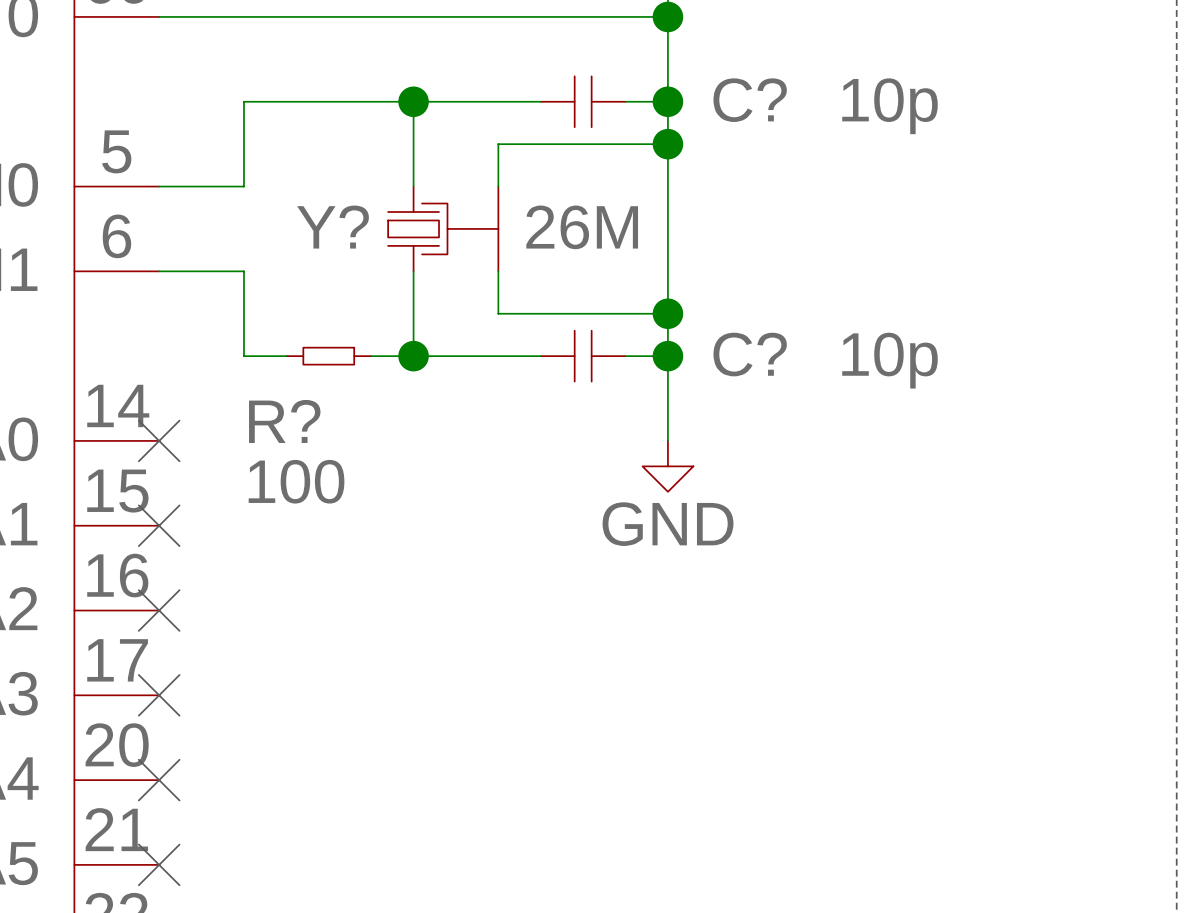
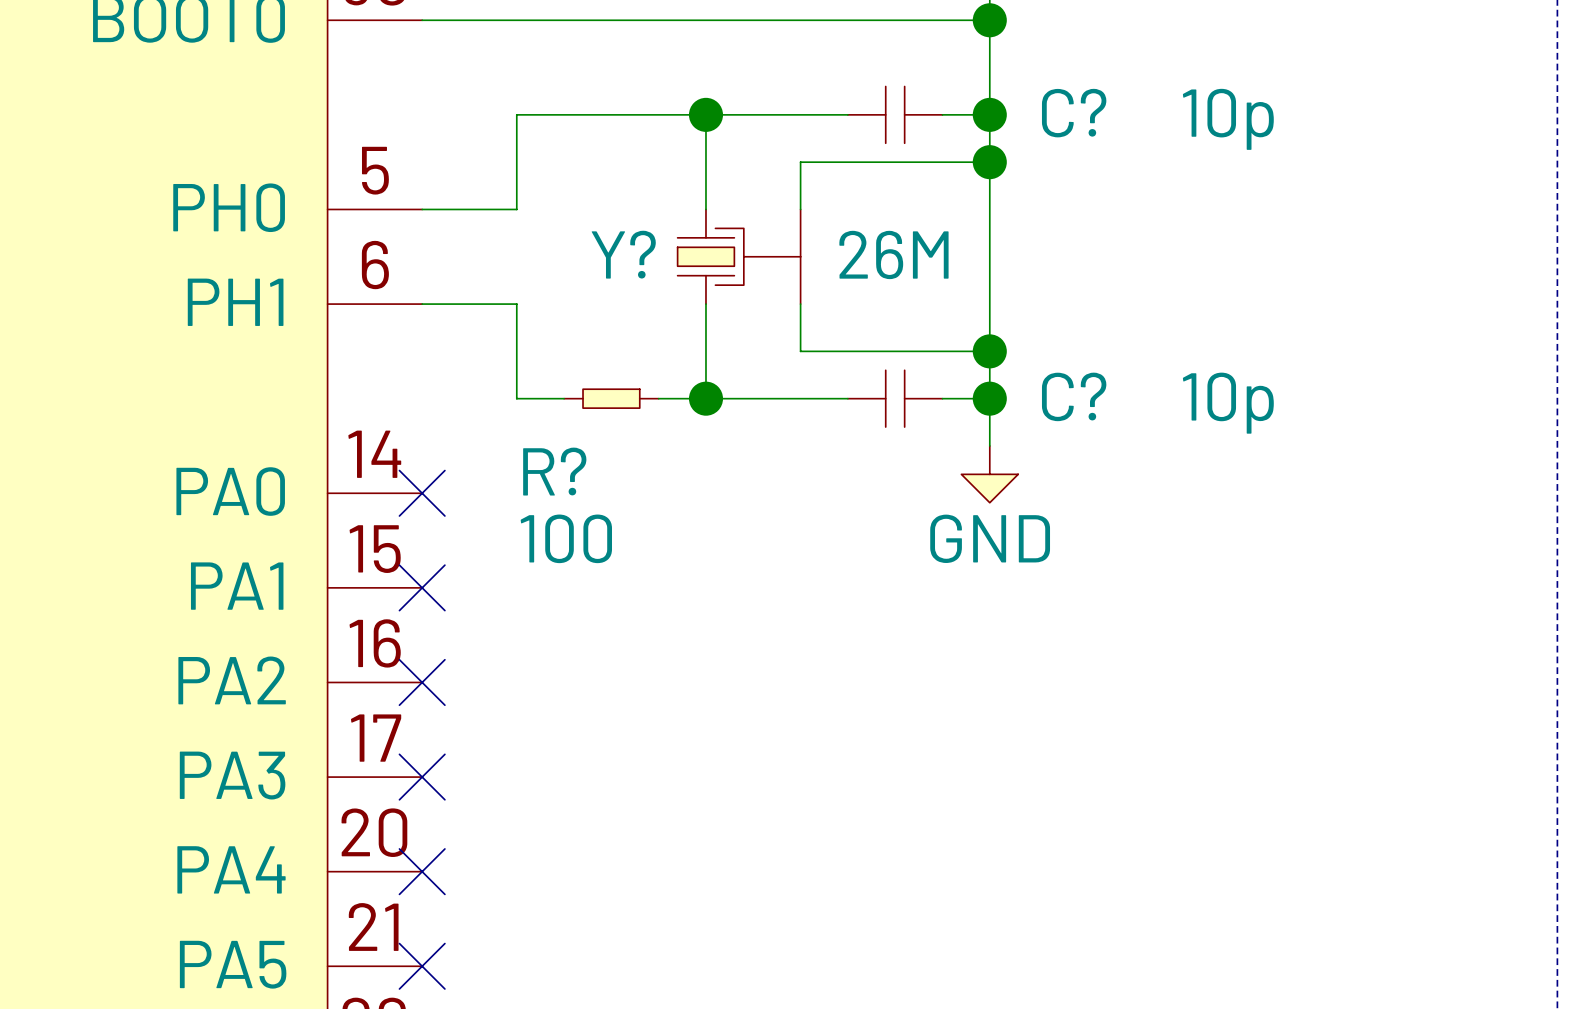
power symbol position: GND (667, 466) -> GND (989, 474)

